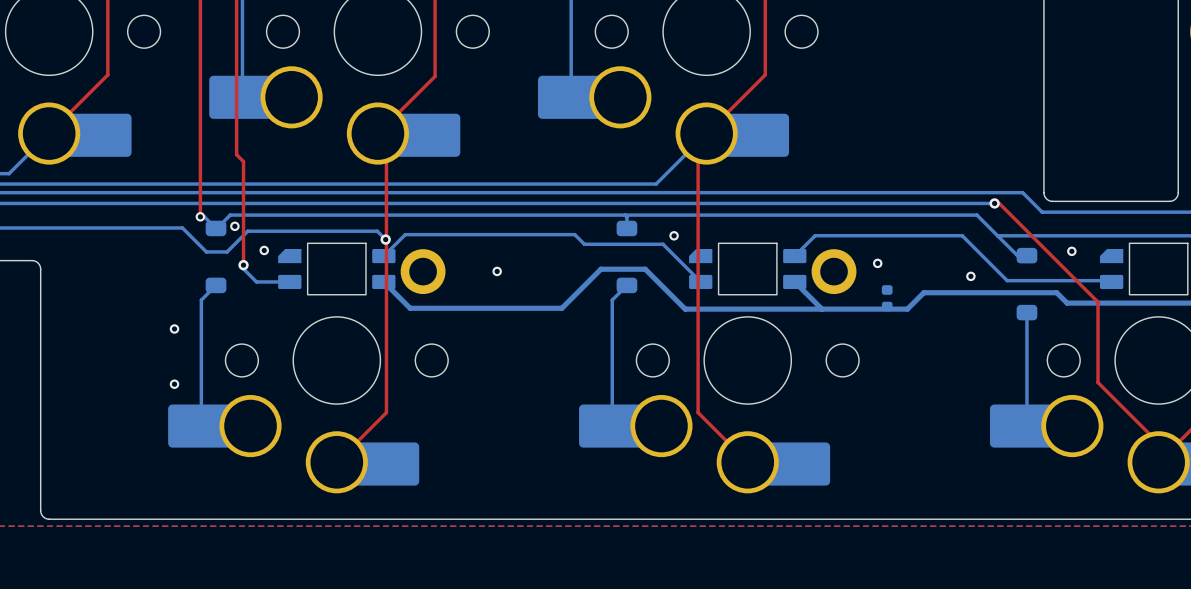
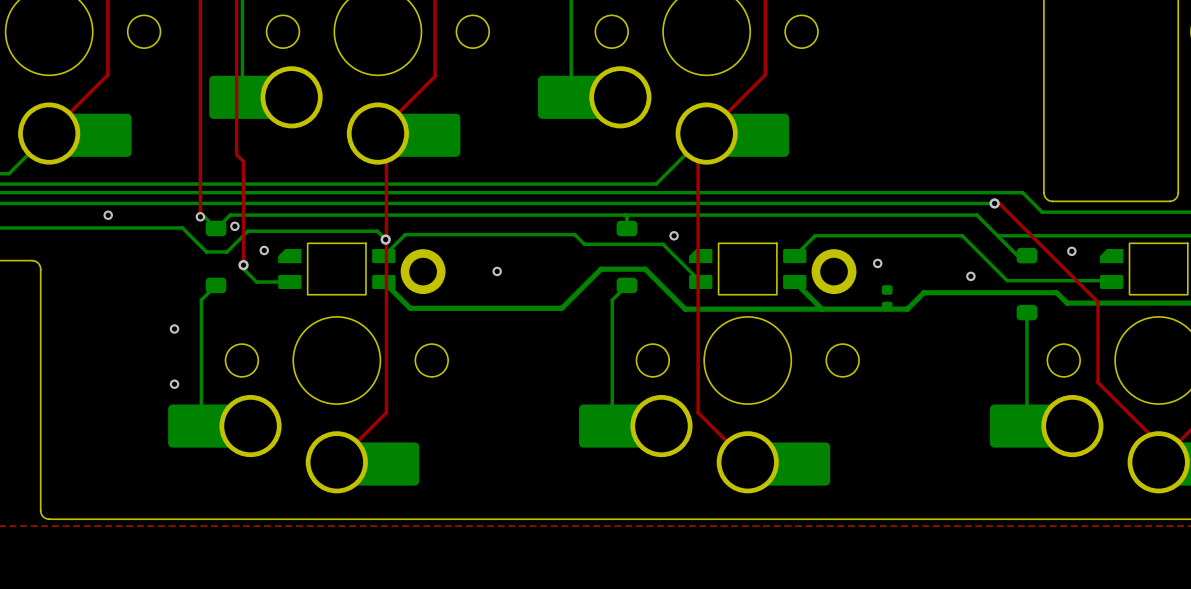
via: none -> (108, 215)

